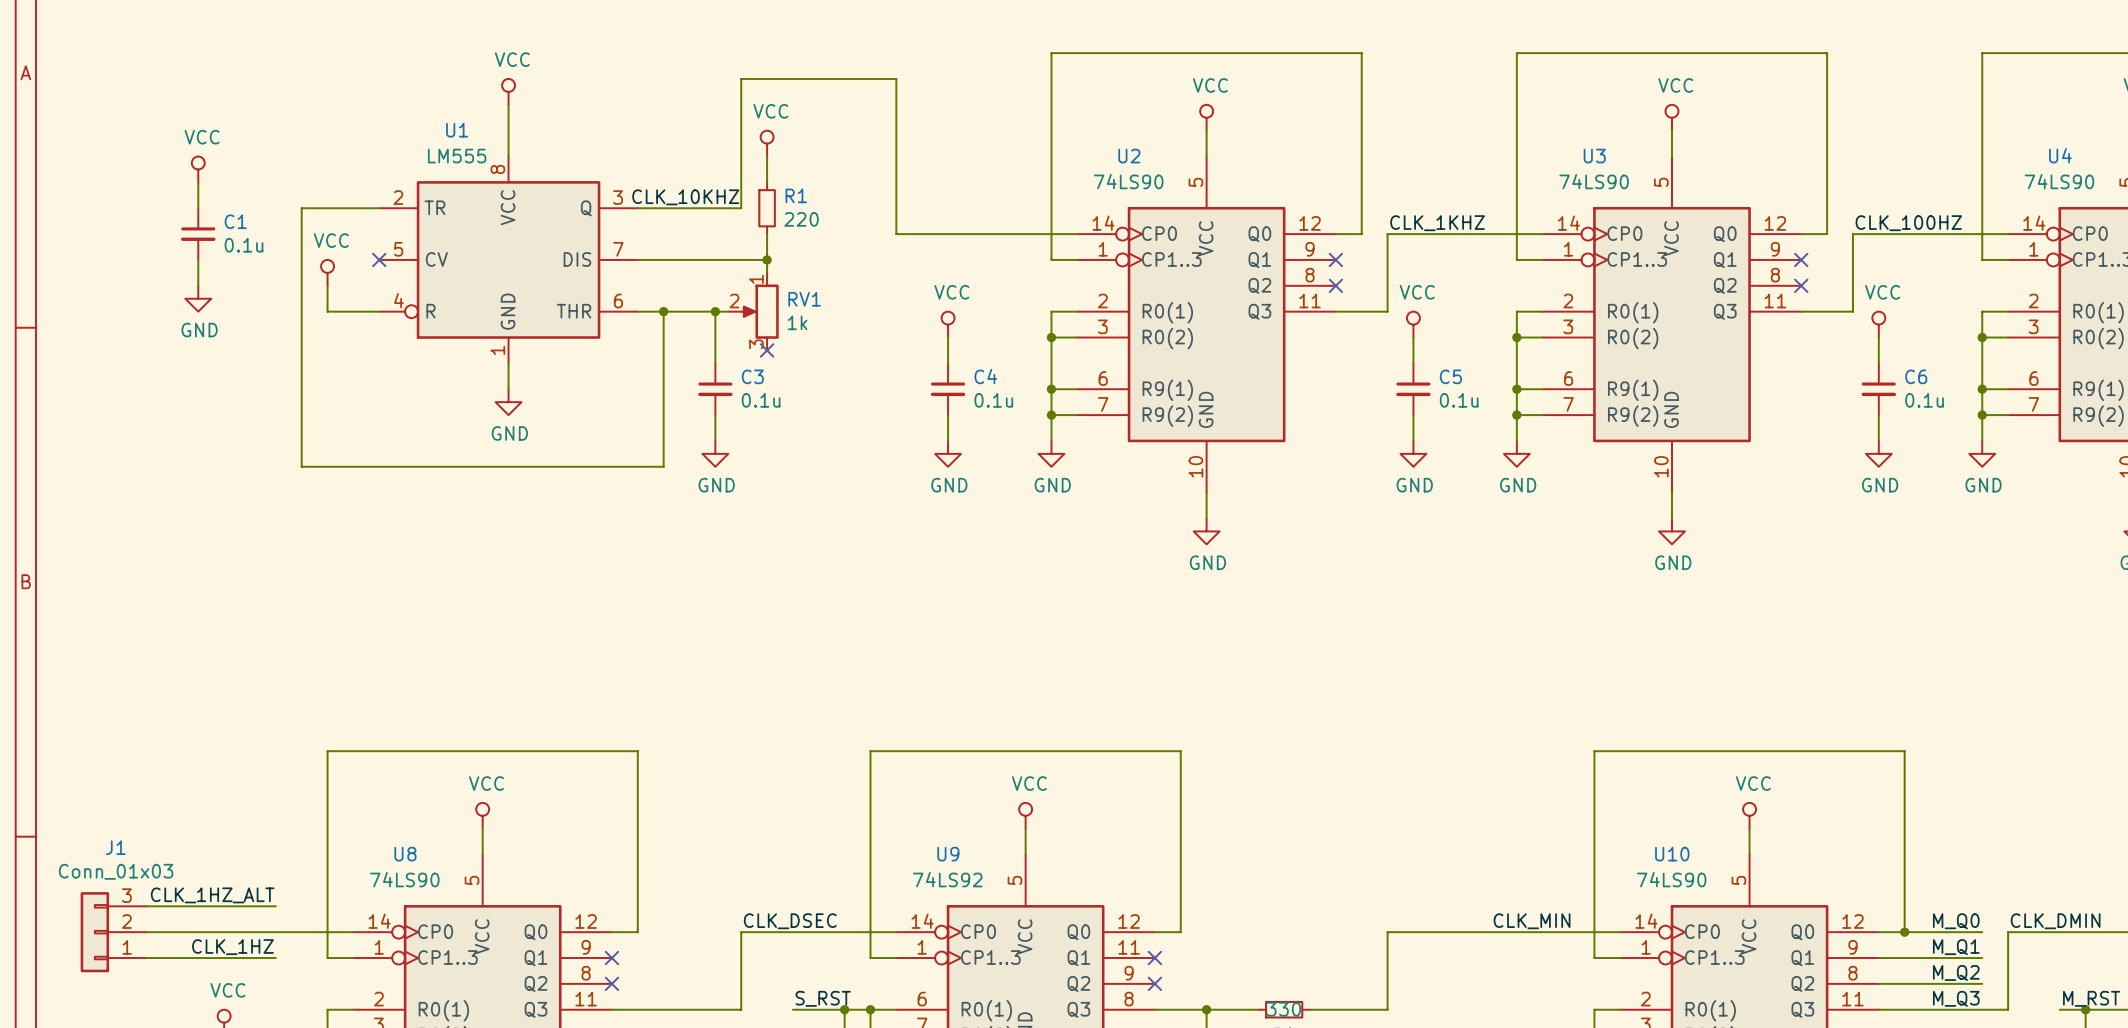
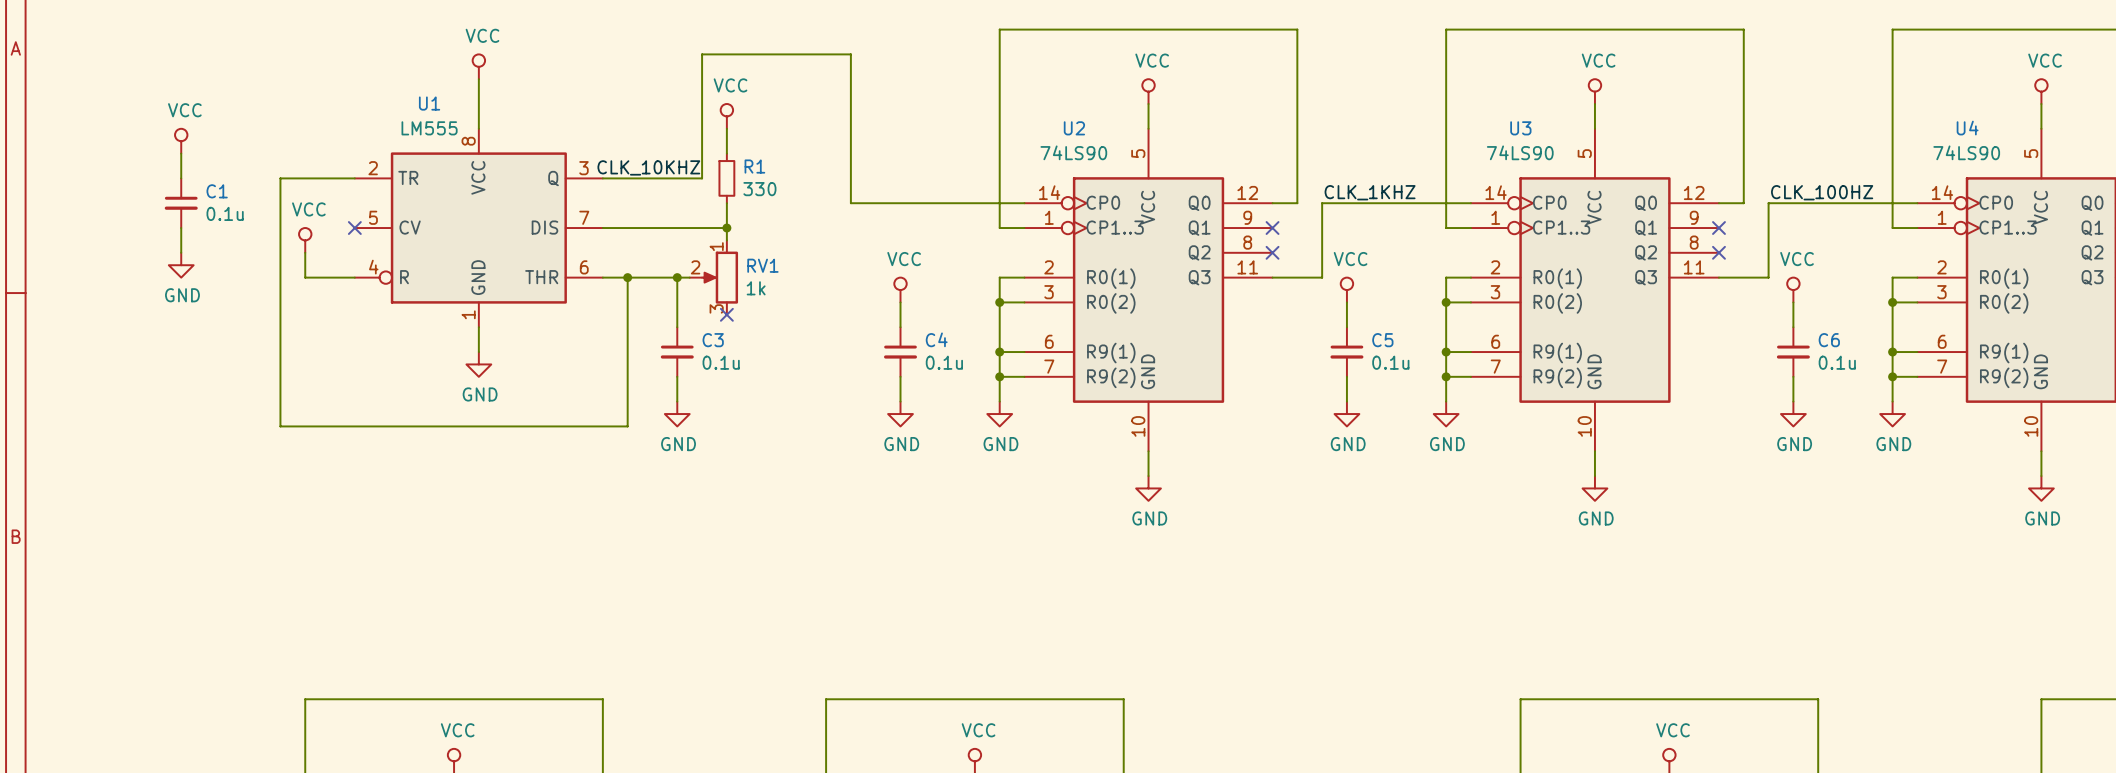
R1 value: 220 (801, 219) -> 330 (759, 189)

